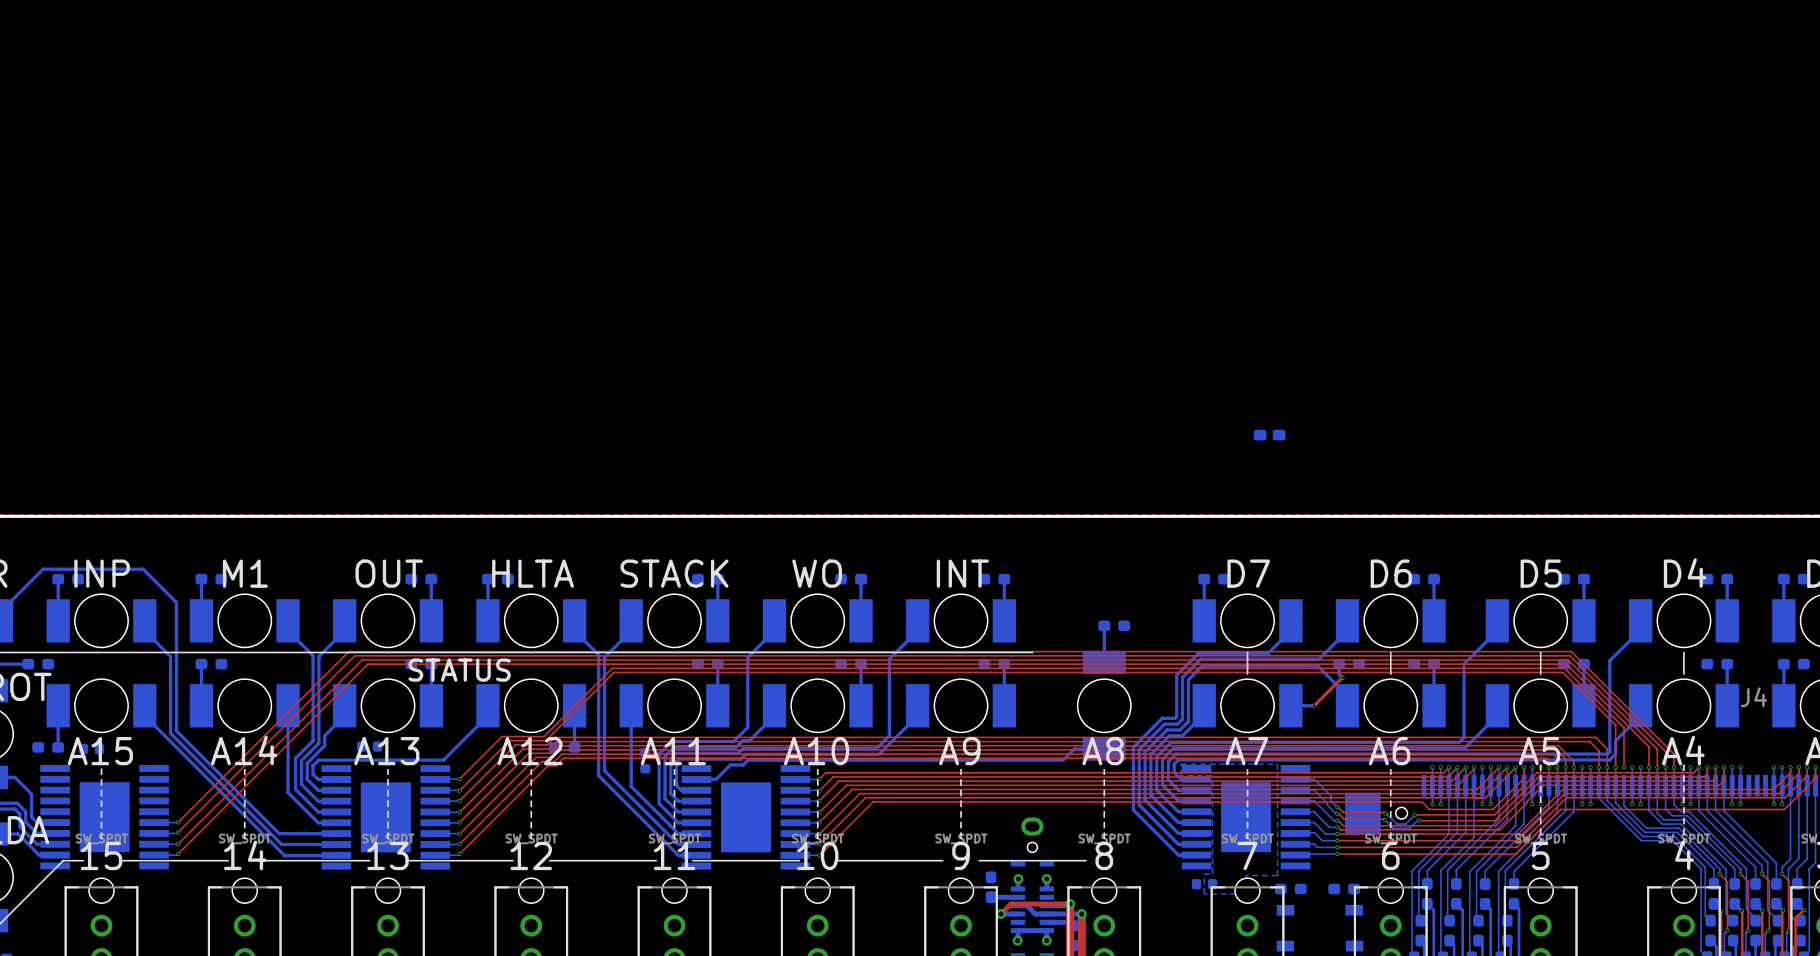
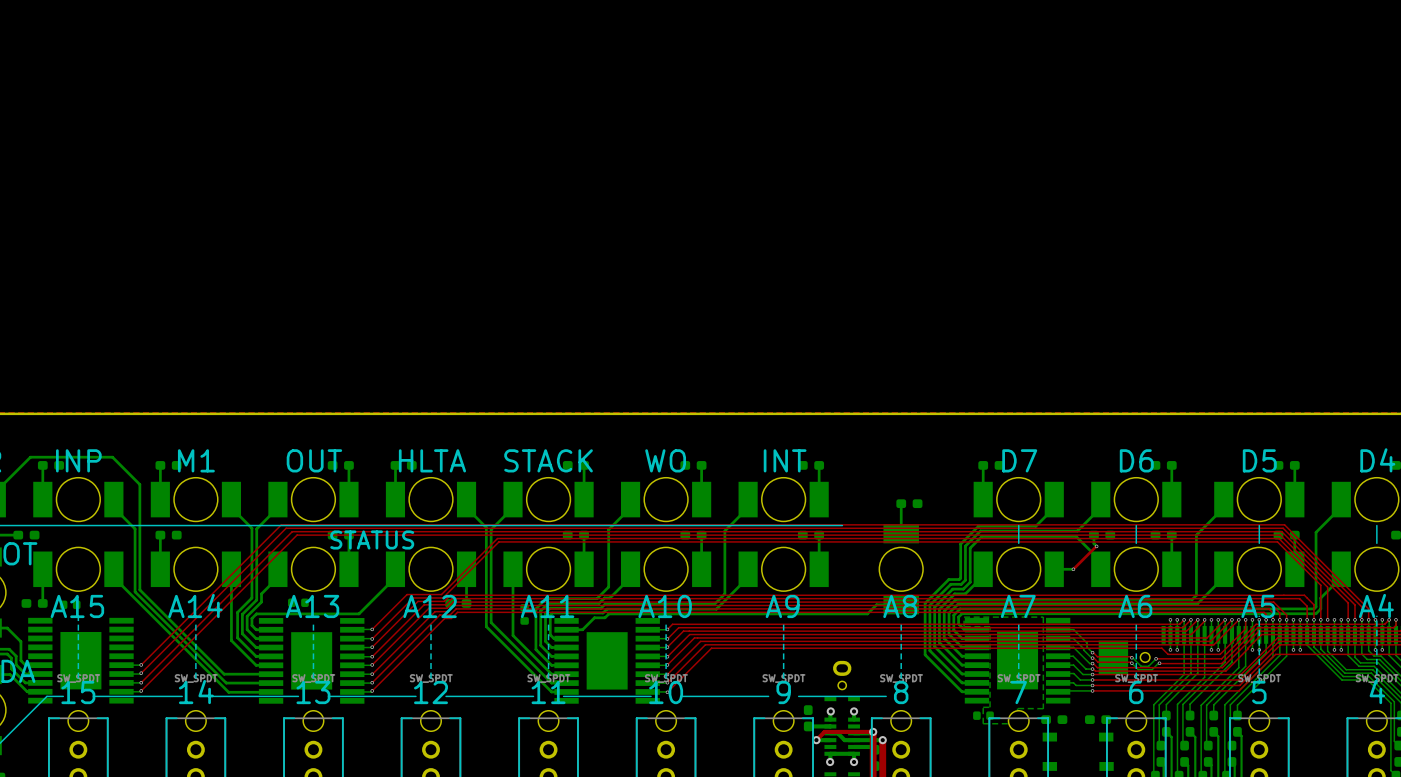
part: (1269, 435) -> none

